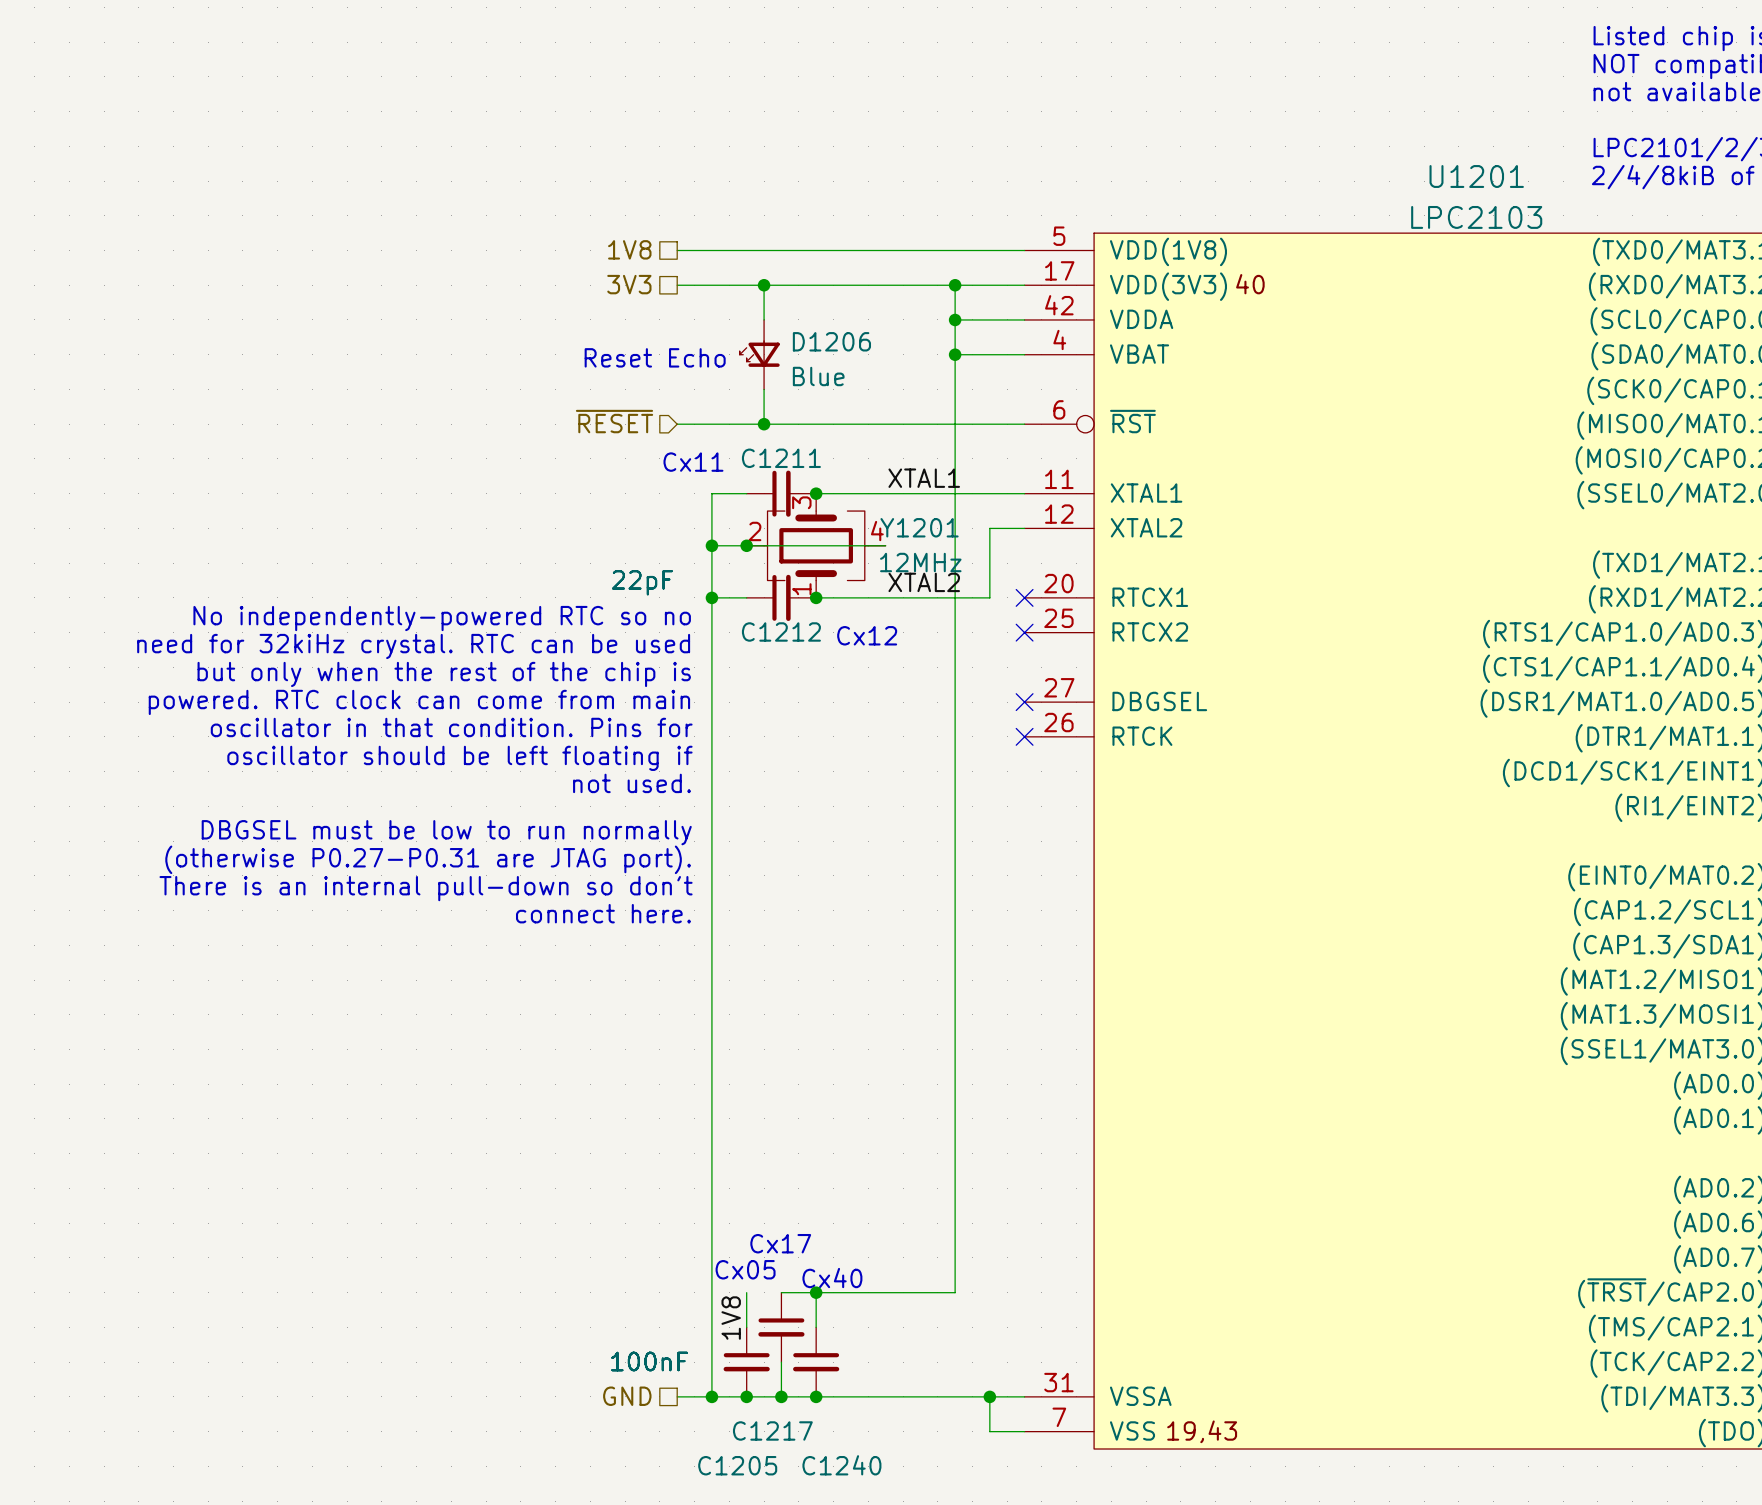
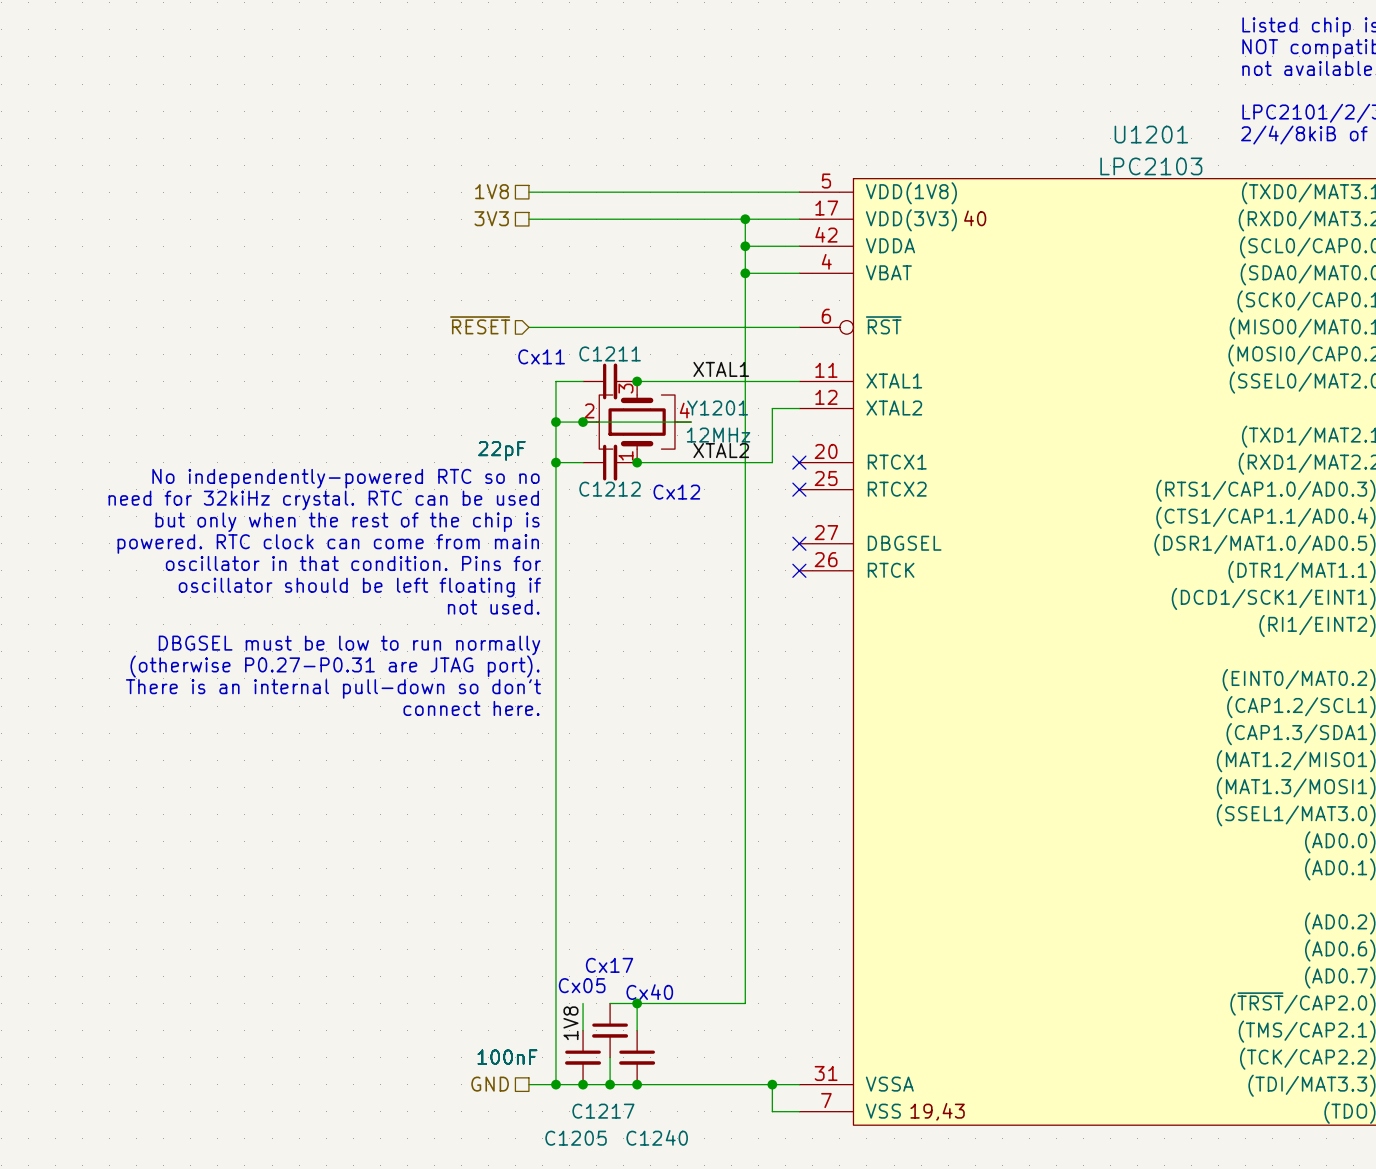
wire: (764, 285) (764, 319) -> none
junction: (764, 285) -> none
D1206: Blue (759, 354) -> none
text: Reset Echo (655, 357) -> none
wire: (764, 389) (764, 424) -> none
junction: (764, 424) -> none

